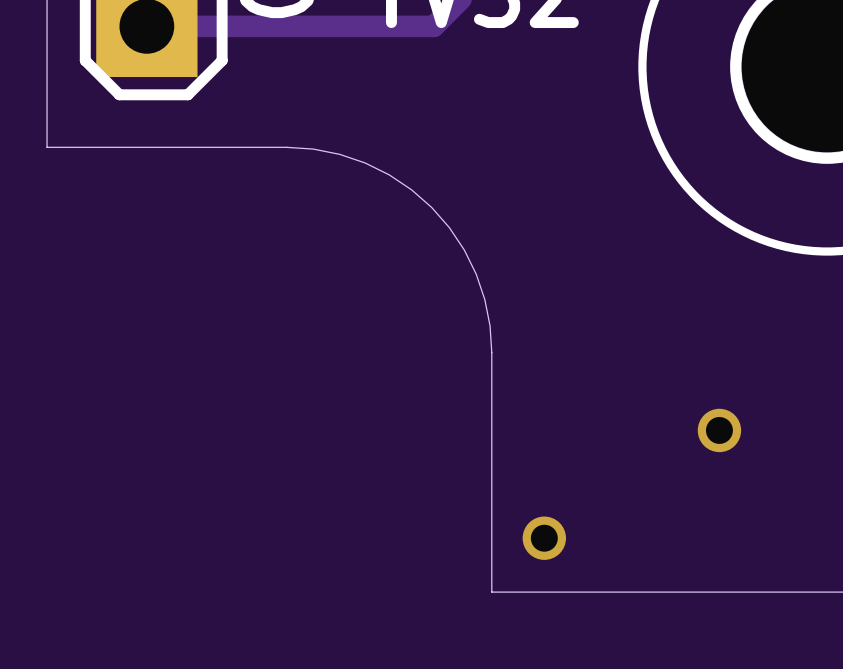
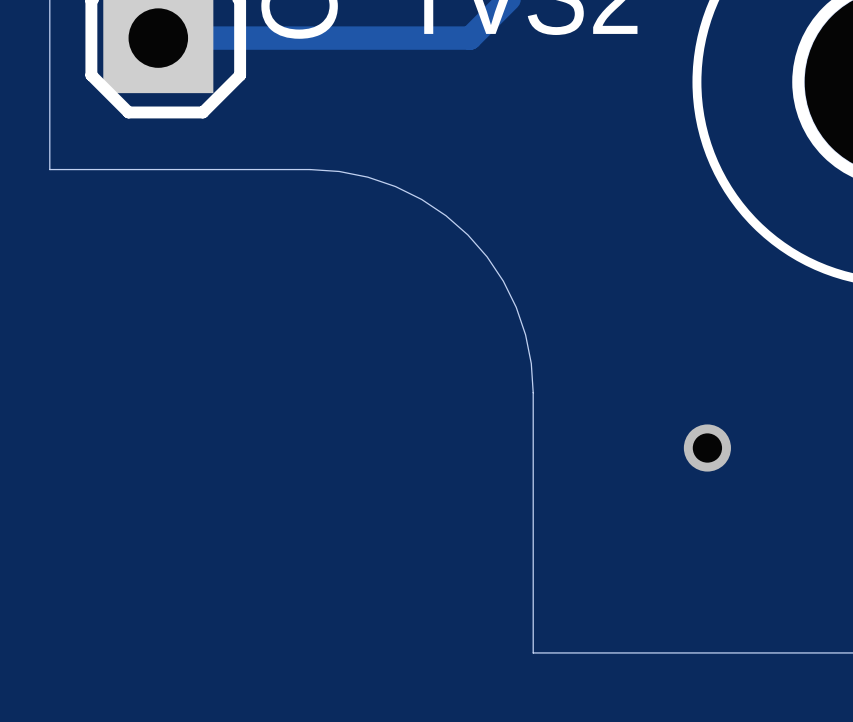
via position: (719, 430) -> (707, 448)
via: (544, 538) -> none

